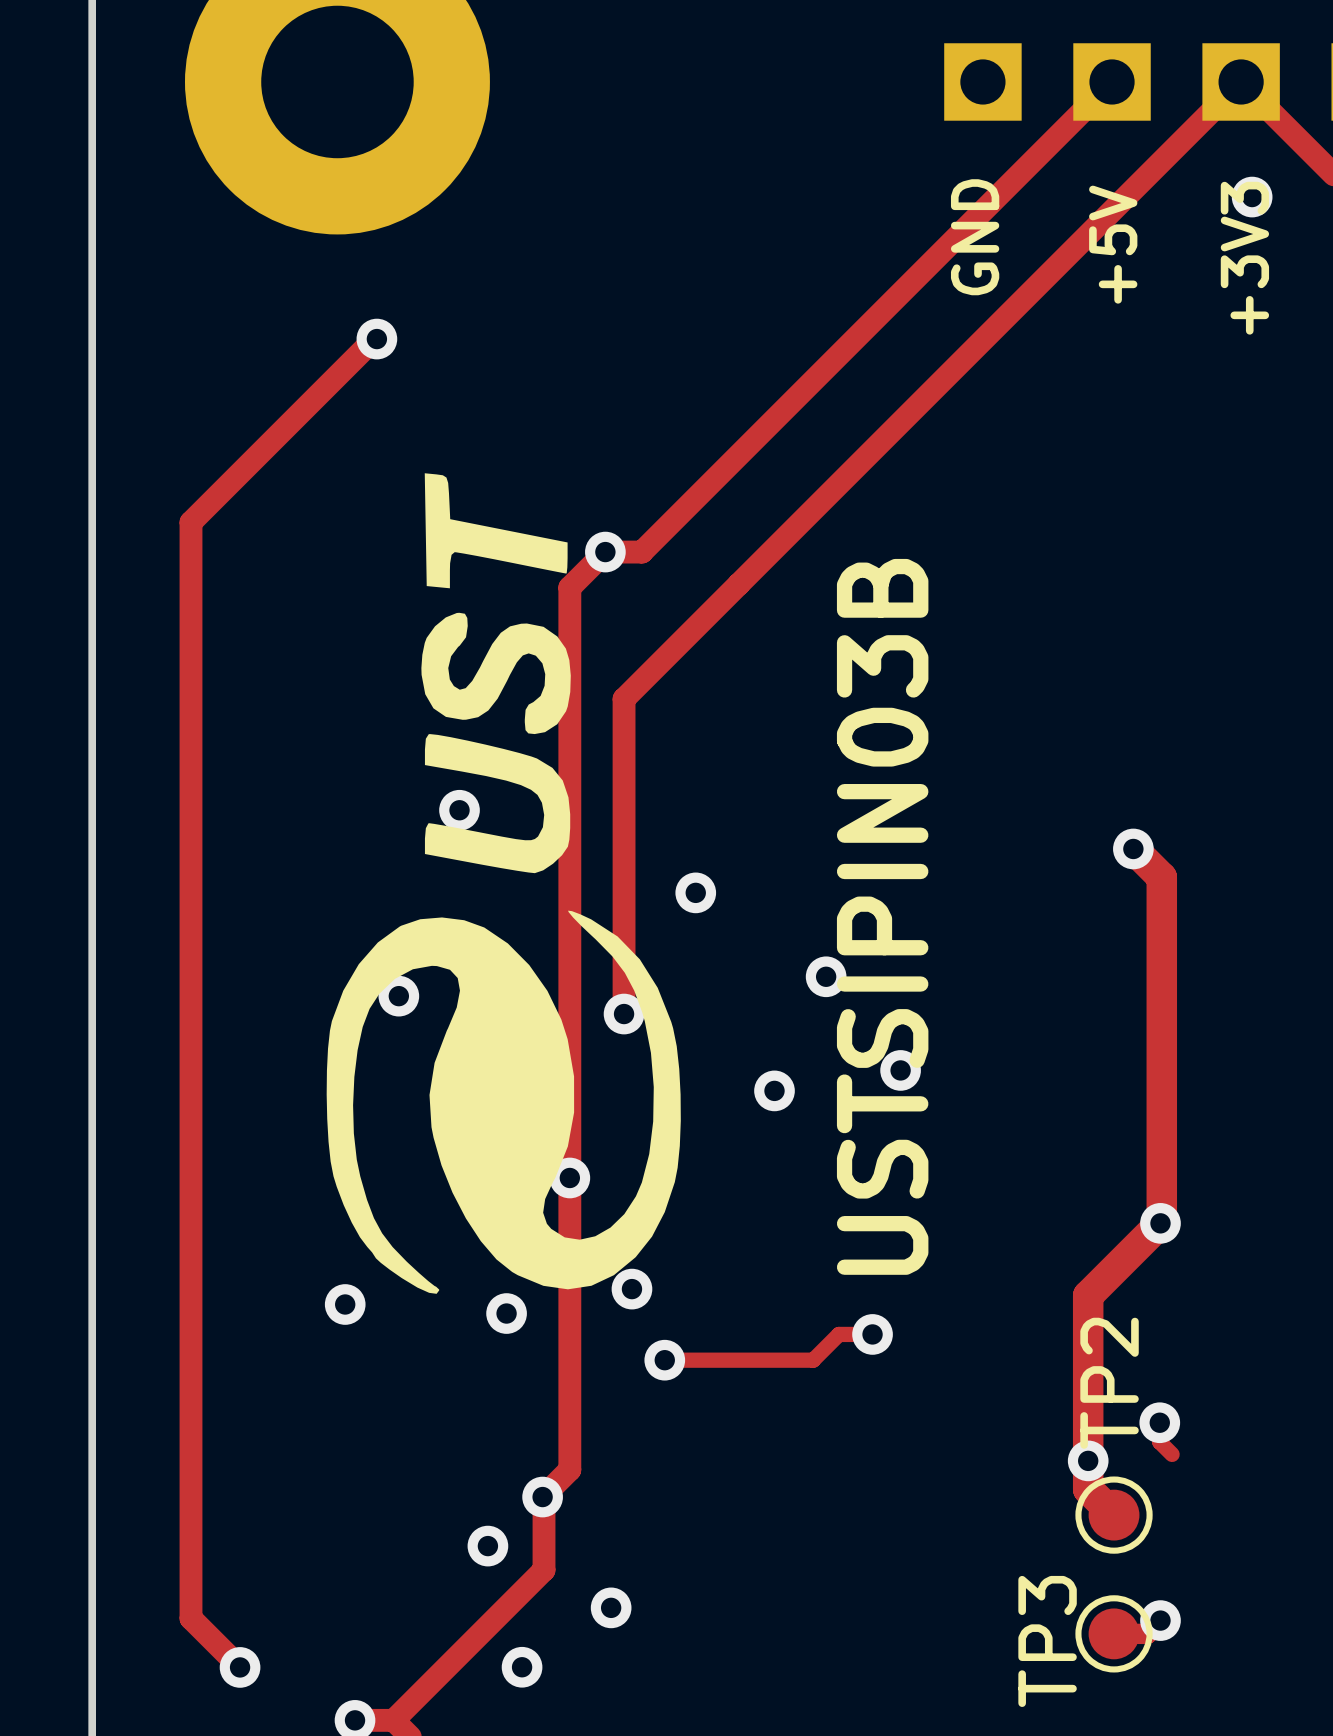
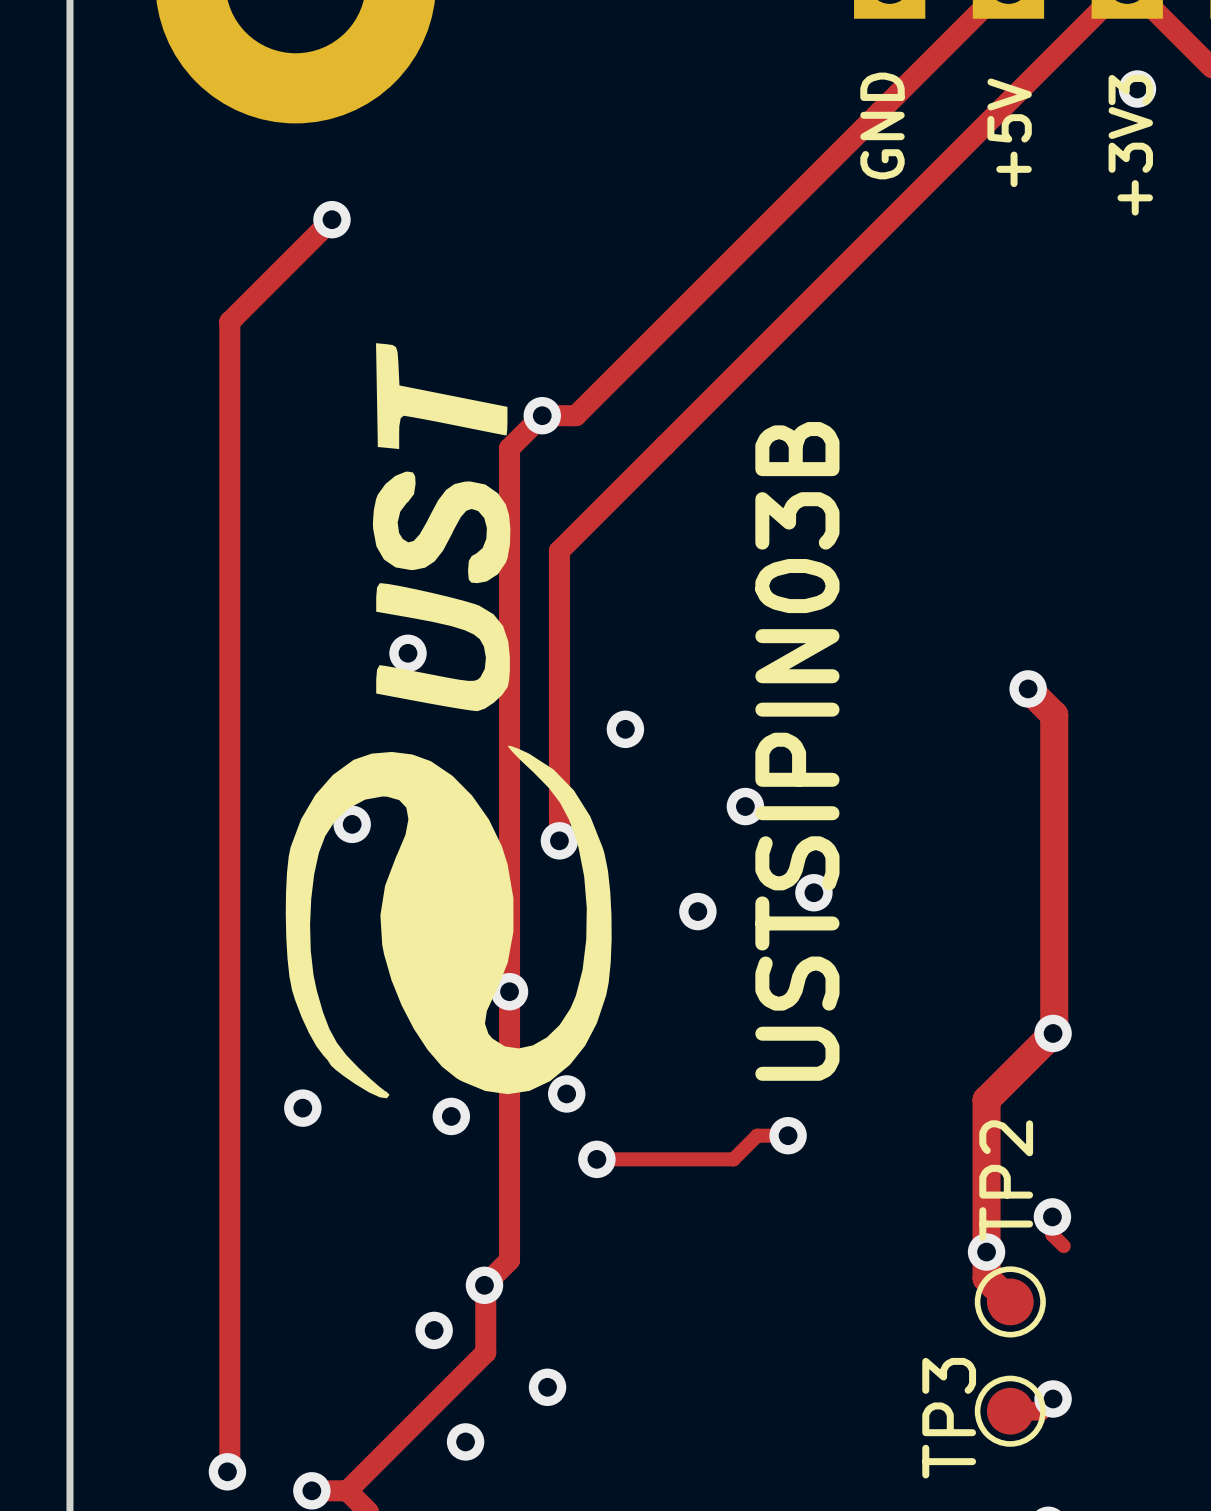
track: (376, 339) (374, 339) (190, 522) (190, 1618) (240, 1667) -> (331, 219) (229, 321) (229, 1469) (227, 1471)
via position: (240, 1667) -> (227, 1471)

